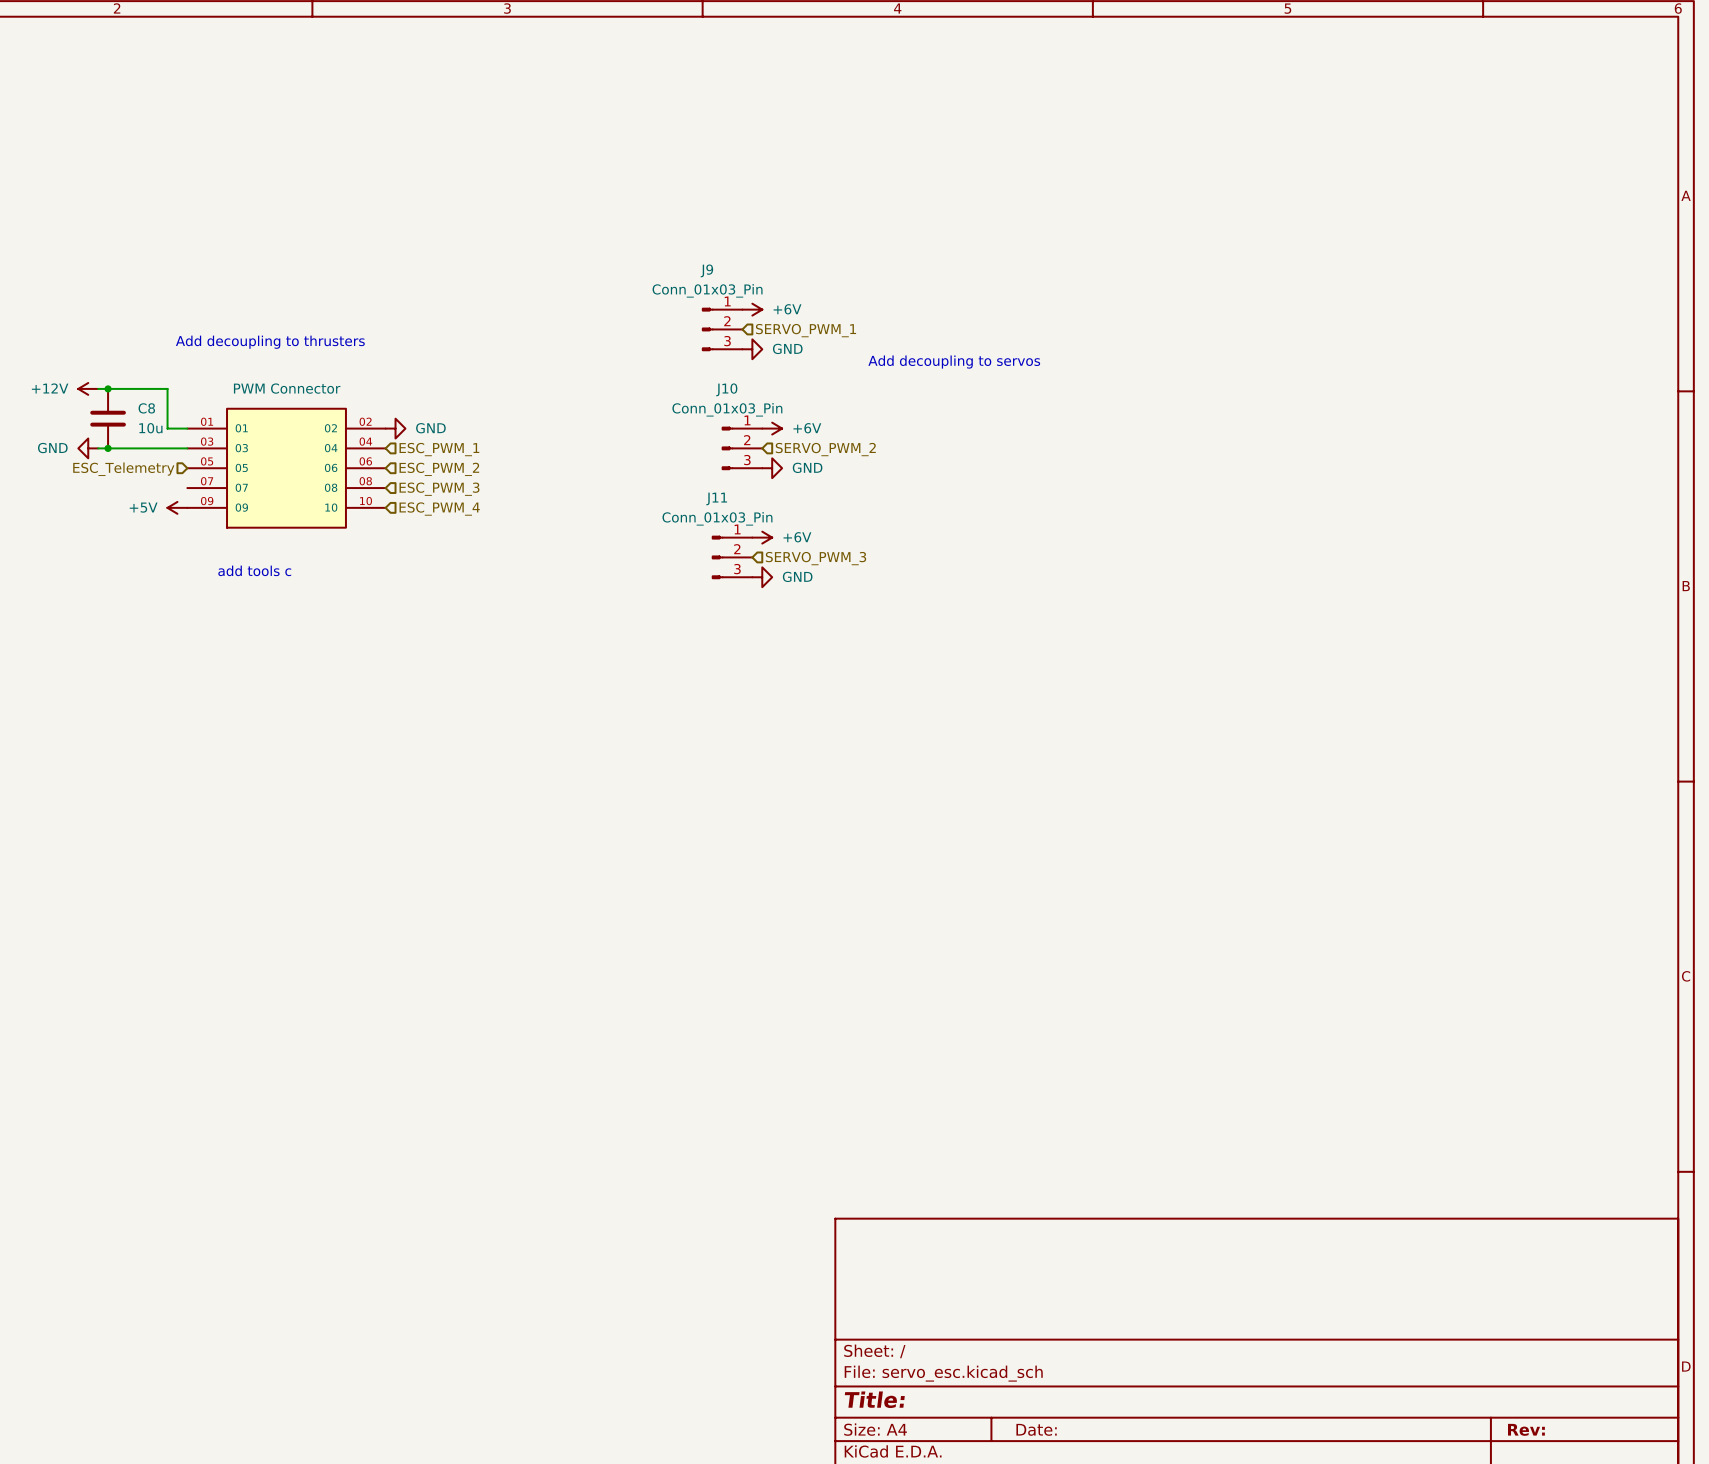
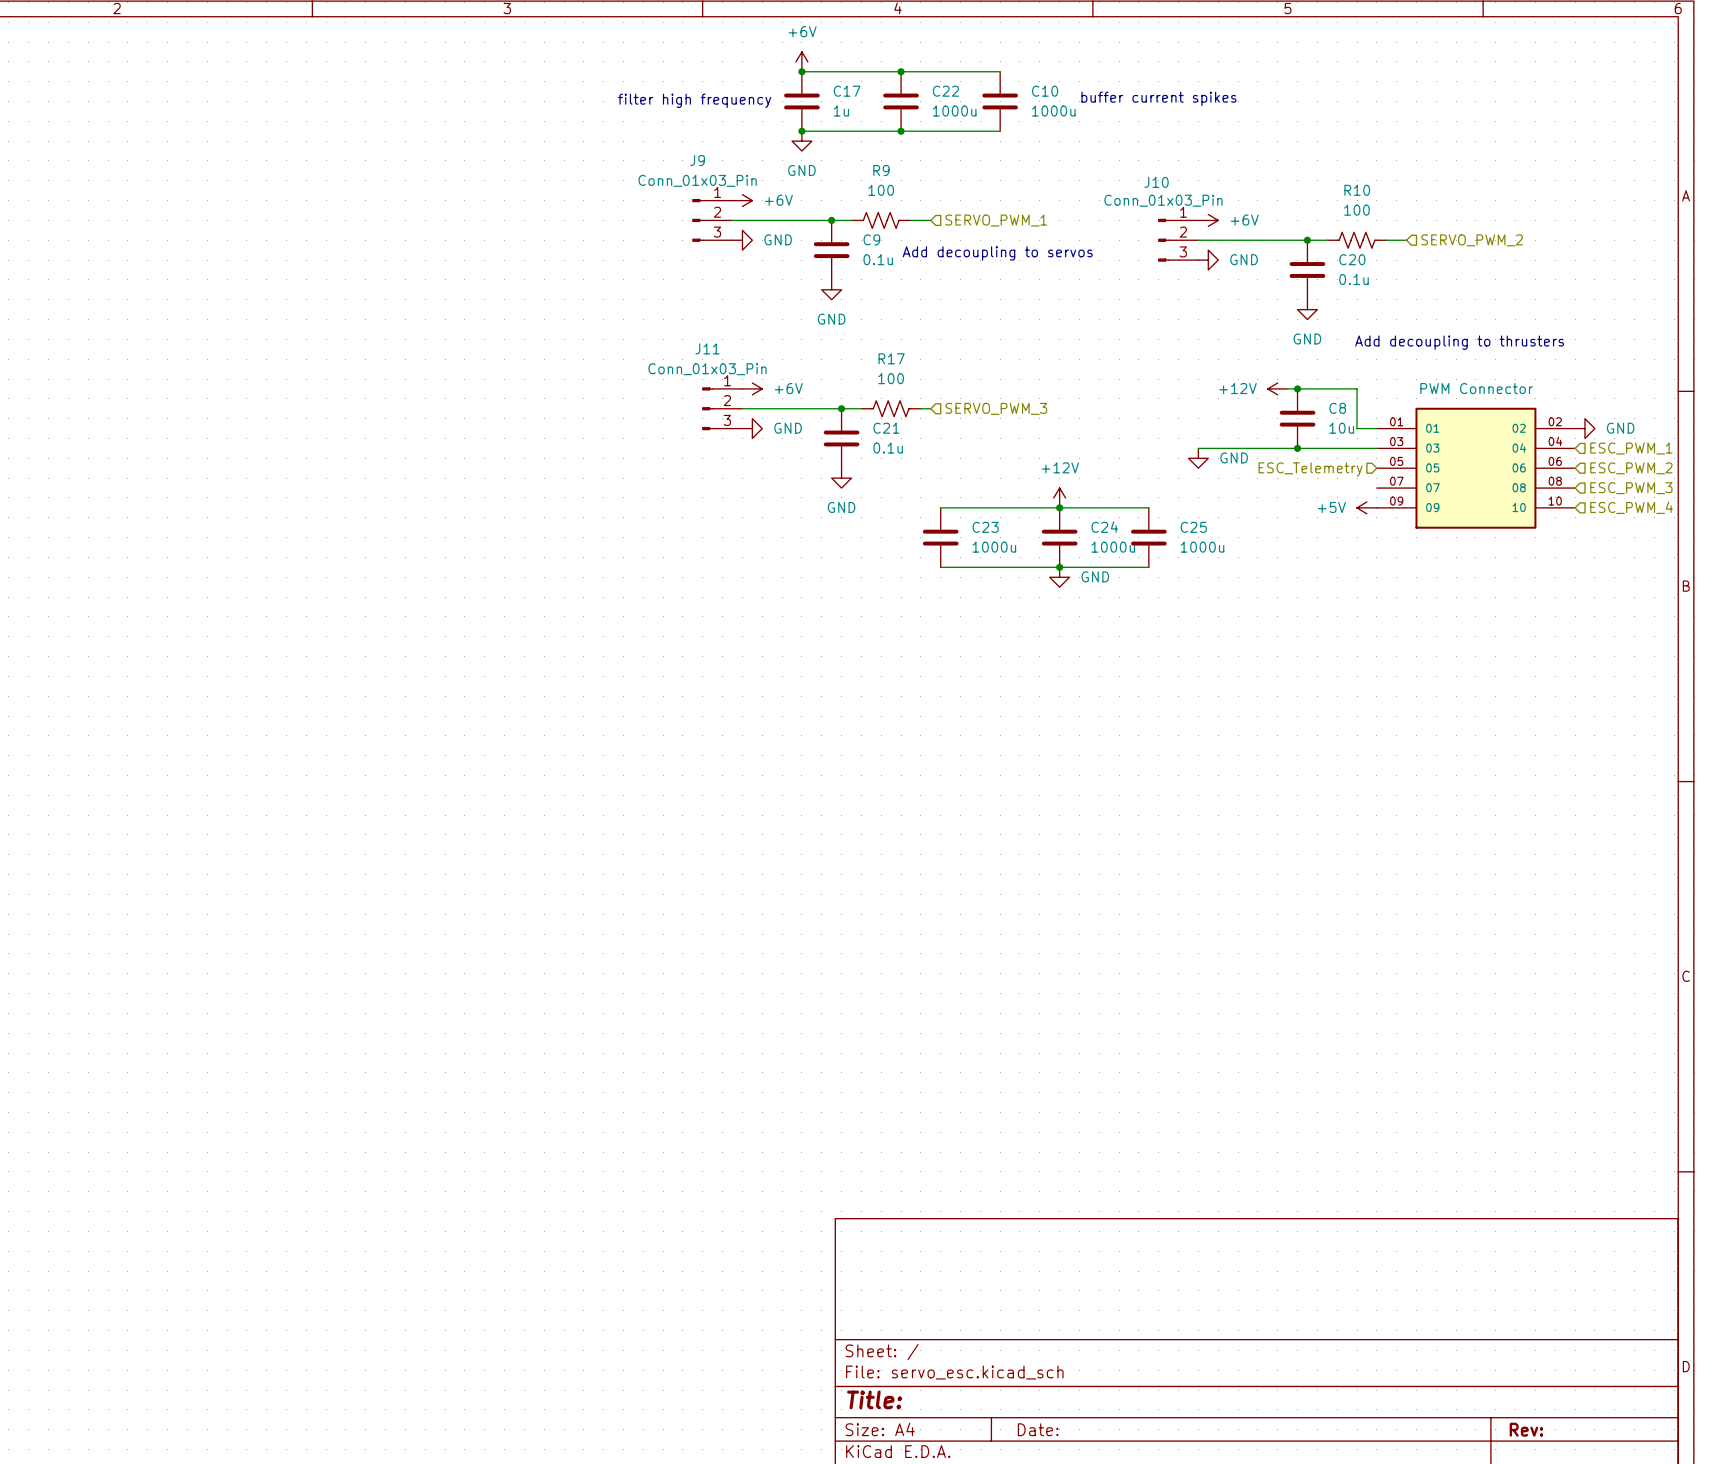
power symbol: none -> +6V (801, 61)
wire: none -> (801, 71) (1000, 71)
junction: none -> (801, 71)
junction: none -> (901, 71)
text: none -> buffer current spikes (1158, 98)
text: none -> filter high frequency (694, 100)
C17: none -> 1u (801, 101)
C22: none -> 1000u (901, 101)
C10: none -> 1000u (1000, 101)
wire: none -> (801, 131) (1000, 131)
junction: none -> (801, 131)
junction: none -> (901, 131)
power symbol: none -> GND (801, 141)
power symbol: none -> +6V (742, 200)
wire: none -> (732, 220) (851, 220)
junction: none -> (831, 220)
R9: none -> 100 (881, 220)
wire: none -> (910, 220) (930, 220)
power symbol: none -> +6V (1208, 220)
hierarchical label: none -> SERVO_PWM_1 (996, 220)
power symbol: none -> GND (742, 240)
wire: none -> (1198, 240) (1327, 240)
junction: none -> (1307, 240)
R10: none -> 100 (1357, 240)
wire: none -> (1386, 240) (1406, 240)
hierarchical label: none -> SERVO_PWM_2 (1472, 240)
C9: none -> 0.1u (831, 250)
power symbol: none -> GND (1208, 260)
C20: none -> 0.1u (1307, 269)
power symbol: none -> GND (831, 289)
power symbol: +6V (752, 309) -> none
power symbol: none -> GND (1307, 309)
J9 position: (722, 329) -> (712, 220)
hierarchical label: SERVO_PWM_1 (806, 330) -> none
text: Add decoupling to thrusters (270, 342) -> none
text: none -> Add decoupling to thrusters (1459, 342)
power symbol: GND (752, 349) -> none
text position: Add decoupling to servos (954, 362) -> Add decoupling to servos (997, 253)
power symbol: +12V (88, 388) -> none
wire: (98, 388) (167, 388) (167, 428) (187, 428) -> none
junction: (108, 388) -> none
power symbol: none -> +6V (752, 388)
power symbol: none -> +12V (1277, 388)
wire: none -> (1287, 388) (1357, 388) (1357, 428) (1376, 428)
junction: none -> (1297, 388)
J10 name position: J10 (726, 389) -> J10 (1156, 182)
wire: none -> (742, 408) (861, 408)
junction: none -> (841, 408)
R17: none -> 100 (891, 408)
wire: none -> (920, 408) (930, 408)
hierarchical label: none -> SERVO_PWM_3 (996, 408)
C8 position: (108, 418) -> (1297, 418)
power symbol: GND (395, 428) -> none
power symbol: none -> GND (752, 428)
power symbol: +6V (772, 428) -> none
power symbol: none -> GND (1584, 428)
C21: none -> 0.1u (841, 438)
power symbol: GND (88, 448) -> none
wire: (98, 448) (187, 448) -> none
junction: (108, 448) -> none
J10 position: (742, 448) -> (1178, 240)
wire: none -> (1198, 448) (1376, 448)
junction: none -> (1297, 448)
hierarchical label: ESC_PWM_1 (439, 449) -> none
hierarchical label: SERVO_PWM_2 (825, 449) -> none
hierarchical label: none -> ESC_PWM_1 (1631, 448)
power symbol: none -> GND (1198, 458)
part: PWM Connector (286, 468) -> none
power symbol: GND (772, 468) -> none
part: none -> PWM Connector (1475, 468)
hierarchical label: ESC_Telemetry (123, 469) -> none
hierarchical label: ESC_PWM_2 (439, 469) -> none
hierarchical label: none -> ESC_Telemetry (1310, 469)
hierarchical label: none -> ESC_PWM_2 (1631, 468)
power symbol: none -> GND (841, 478)
hierarchical label: ESC_PWM_3 (439, 489) -> none
hierarchical label: none -> ESC_PWM_3 (1631, 488)
power symbol: none -> +12V (1059, 497)
power symbol: +5V (177, 507) -> none
wire: none -> (940, 507) (1148, 507)
junction: none -> (1059, 507)
power symbol: none -> +5V (1366, 507)
hierarchical label: ESC_PWM_4 (439, 509) -> none
hierarchical label: none -> ESC_PWM_4 (1631, 507)
power symbol: +6V (762, 537) -> none
C23: none -> 1000u (940, 537)
C24: none -> 1000u (1059, 537)
C25: none -> 1000u (1148, 537)
J11 position: (732, 557) -> (722, 408)
hierarchical label: SERVO_PWM_3 (815, 558) -> none
wire: none -> (940, 567) (1148, 567)
junction: none -> (1059, 567)
text: add tools c (254, 570) -> none
power symbol: GND (762, 577) -> none
power symbol: none -> GND (1059, 577)

